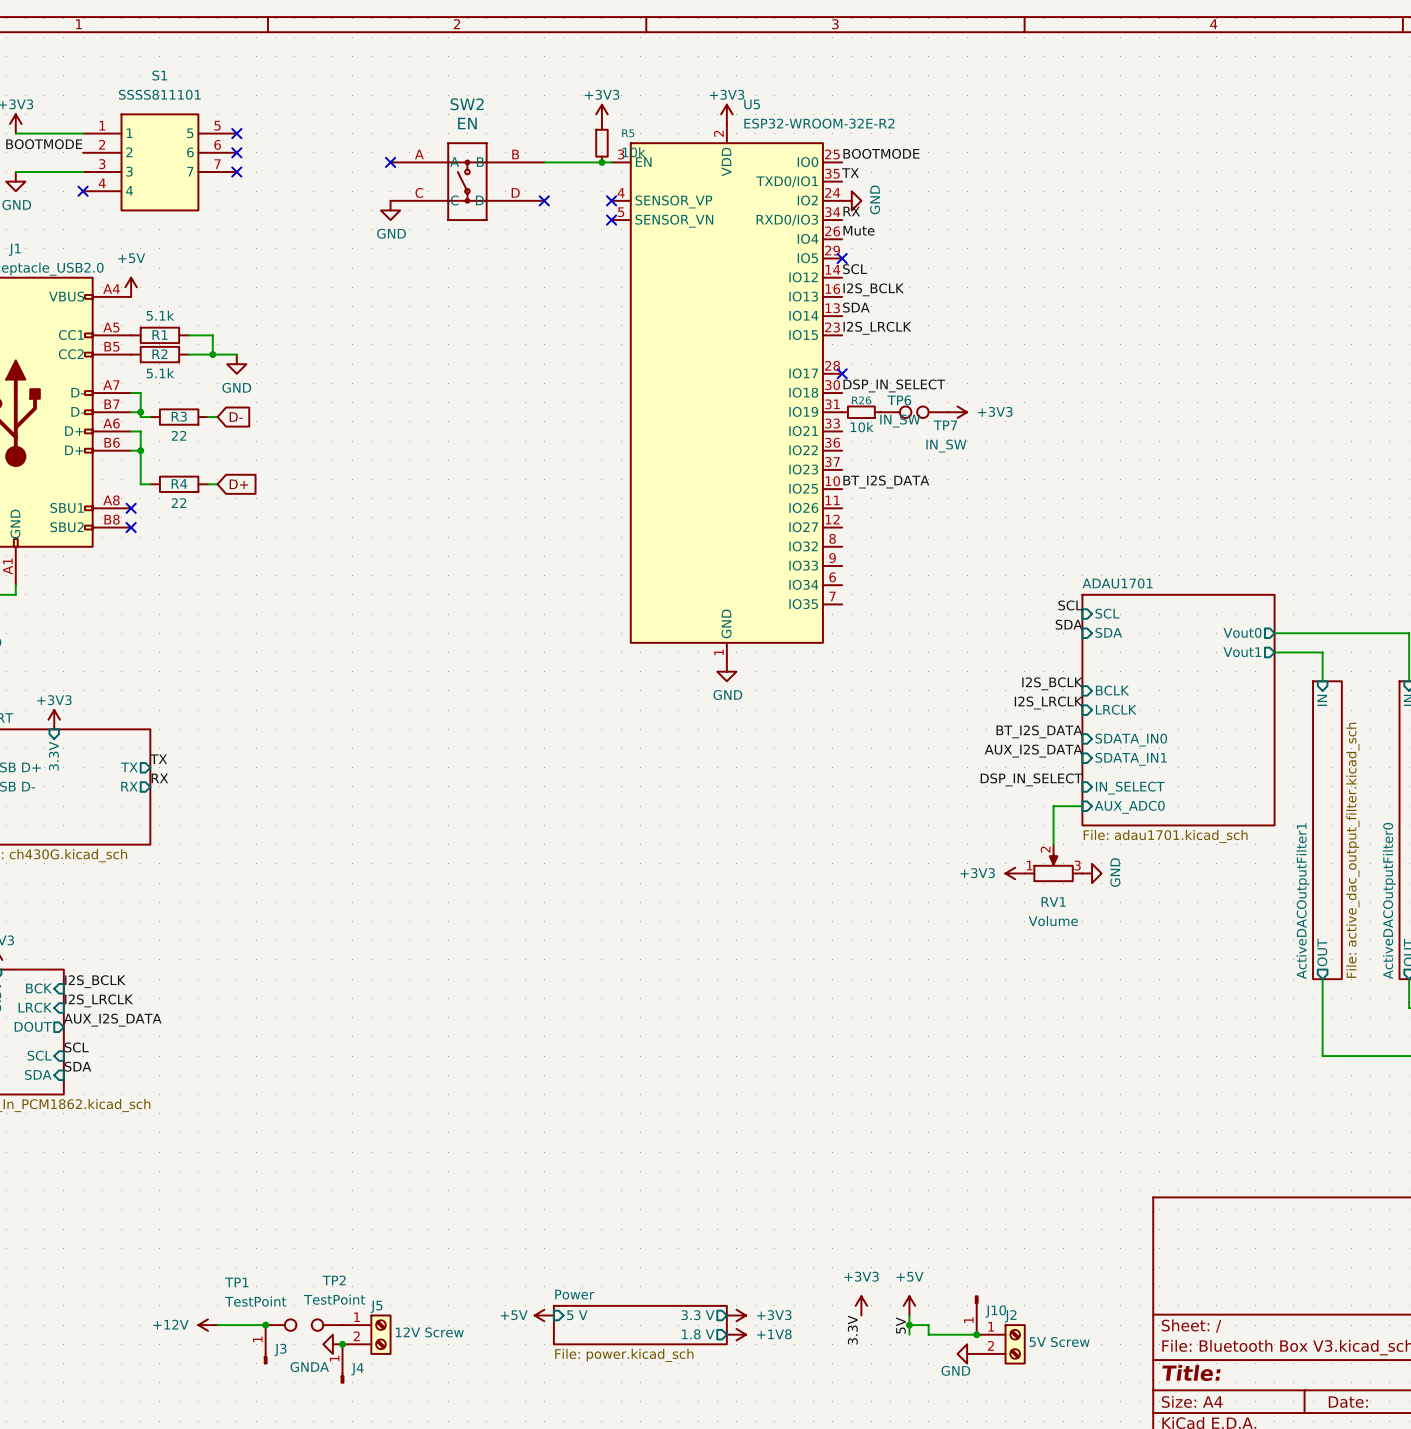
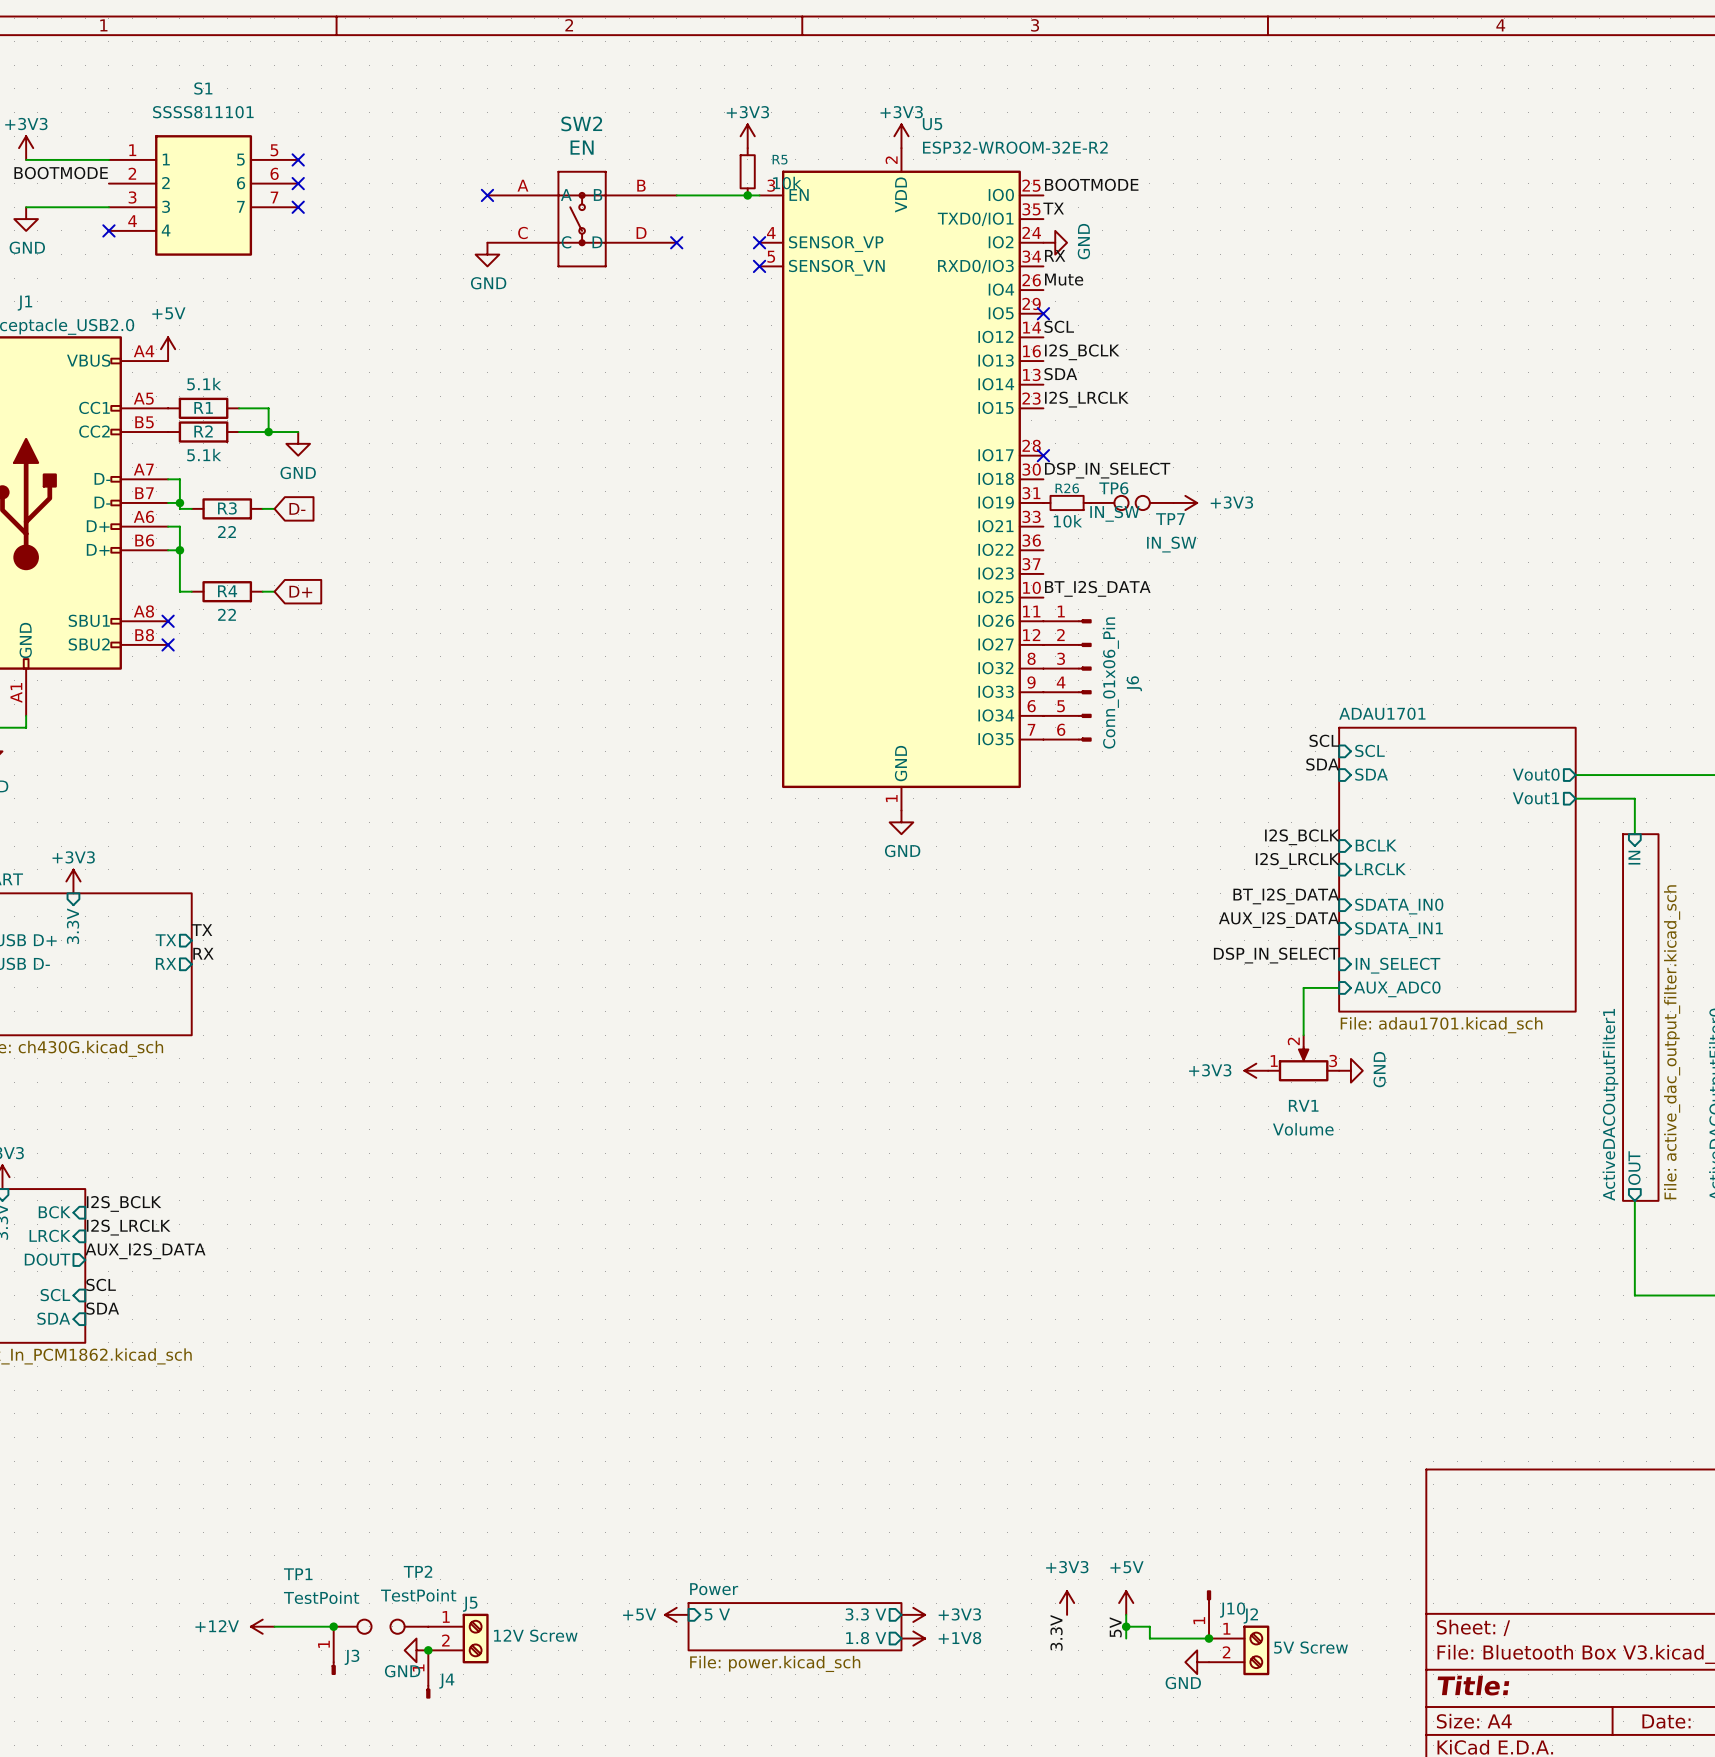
J6: none -> Conn_01x06_Pin (1067, 680)
power symbol: GNDA (332, 1344) -> GND (416, 1650)

